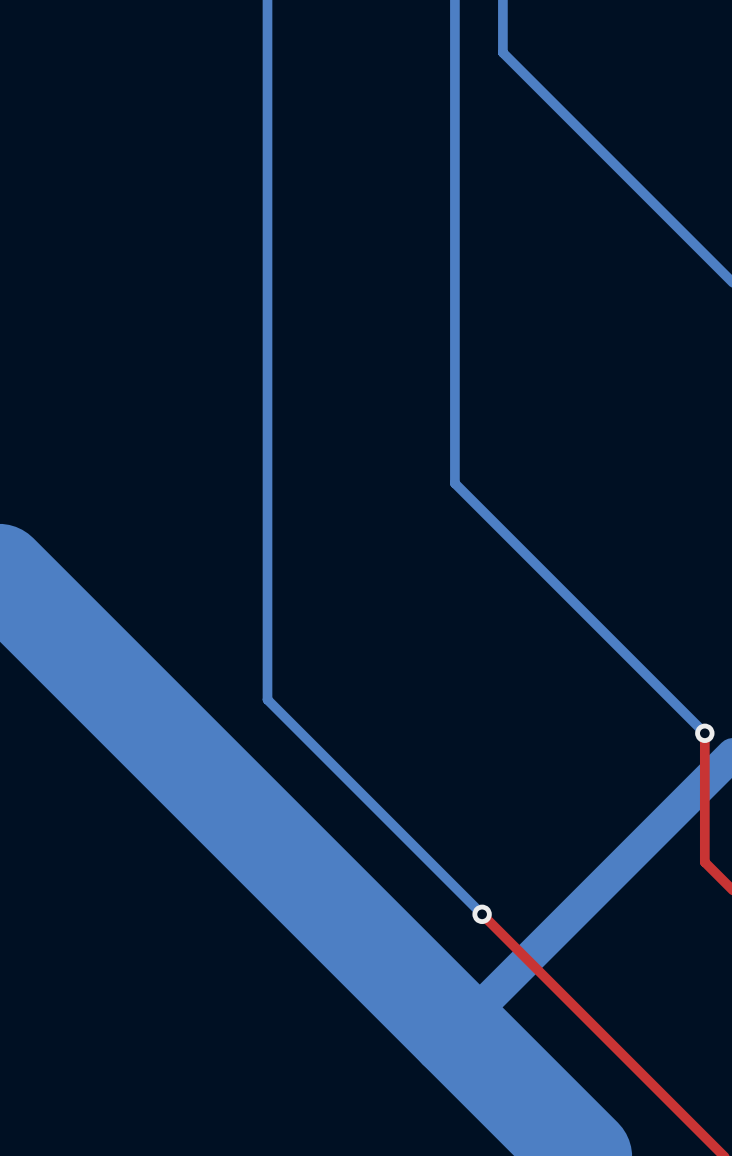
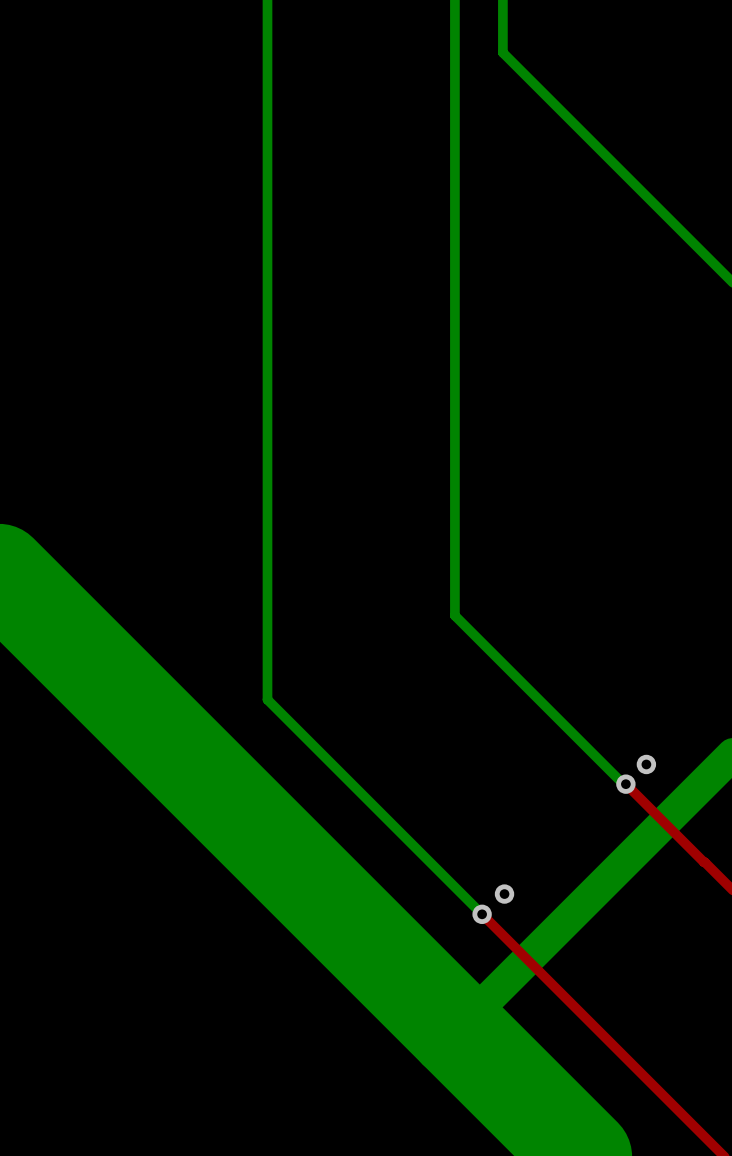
bottom track: (454, 483) (704, 733) -> (454, 483) (454, 615) (623, 784) (625, 784)
top track: (704, 733) (704, 862) -> (625, 784) (704, 862)
via: (704, 733) -> none
via: none -> (646, 764)
via: none -> (625, 784)
via: none -> (504, 894)

